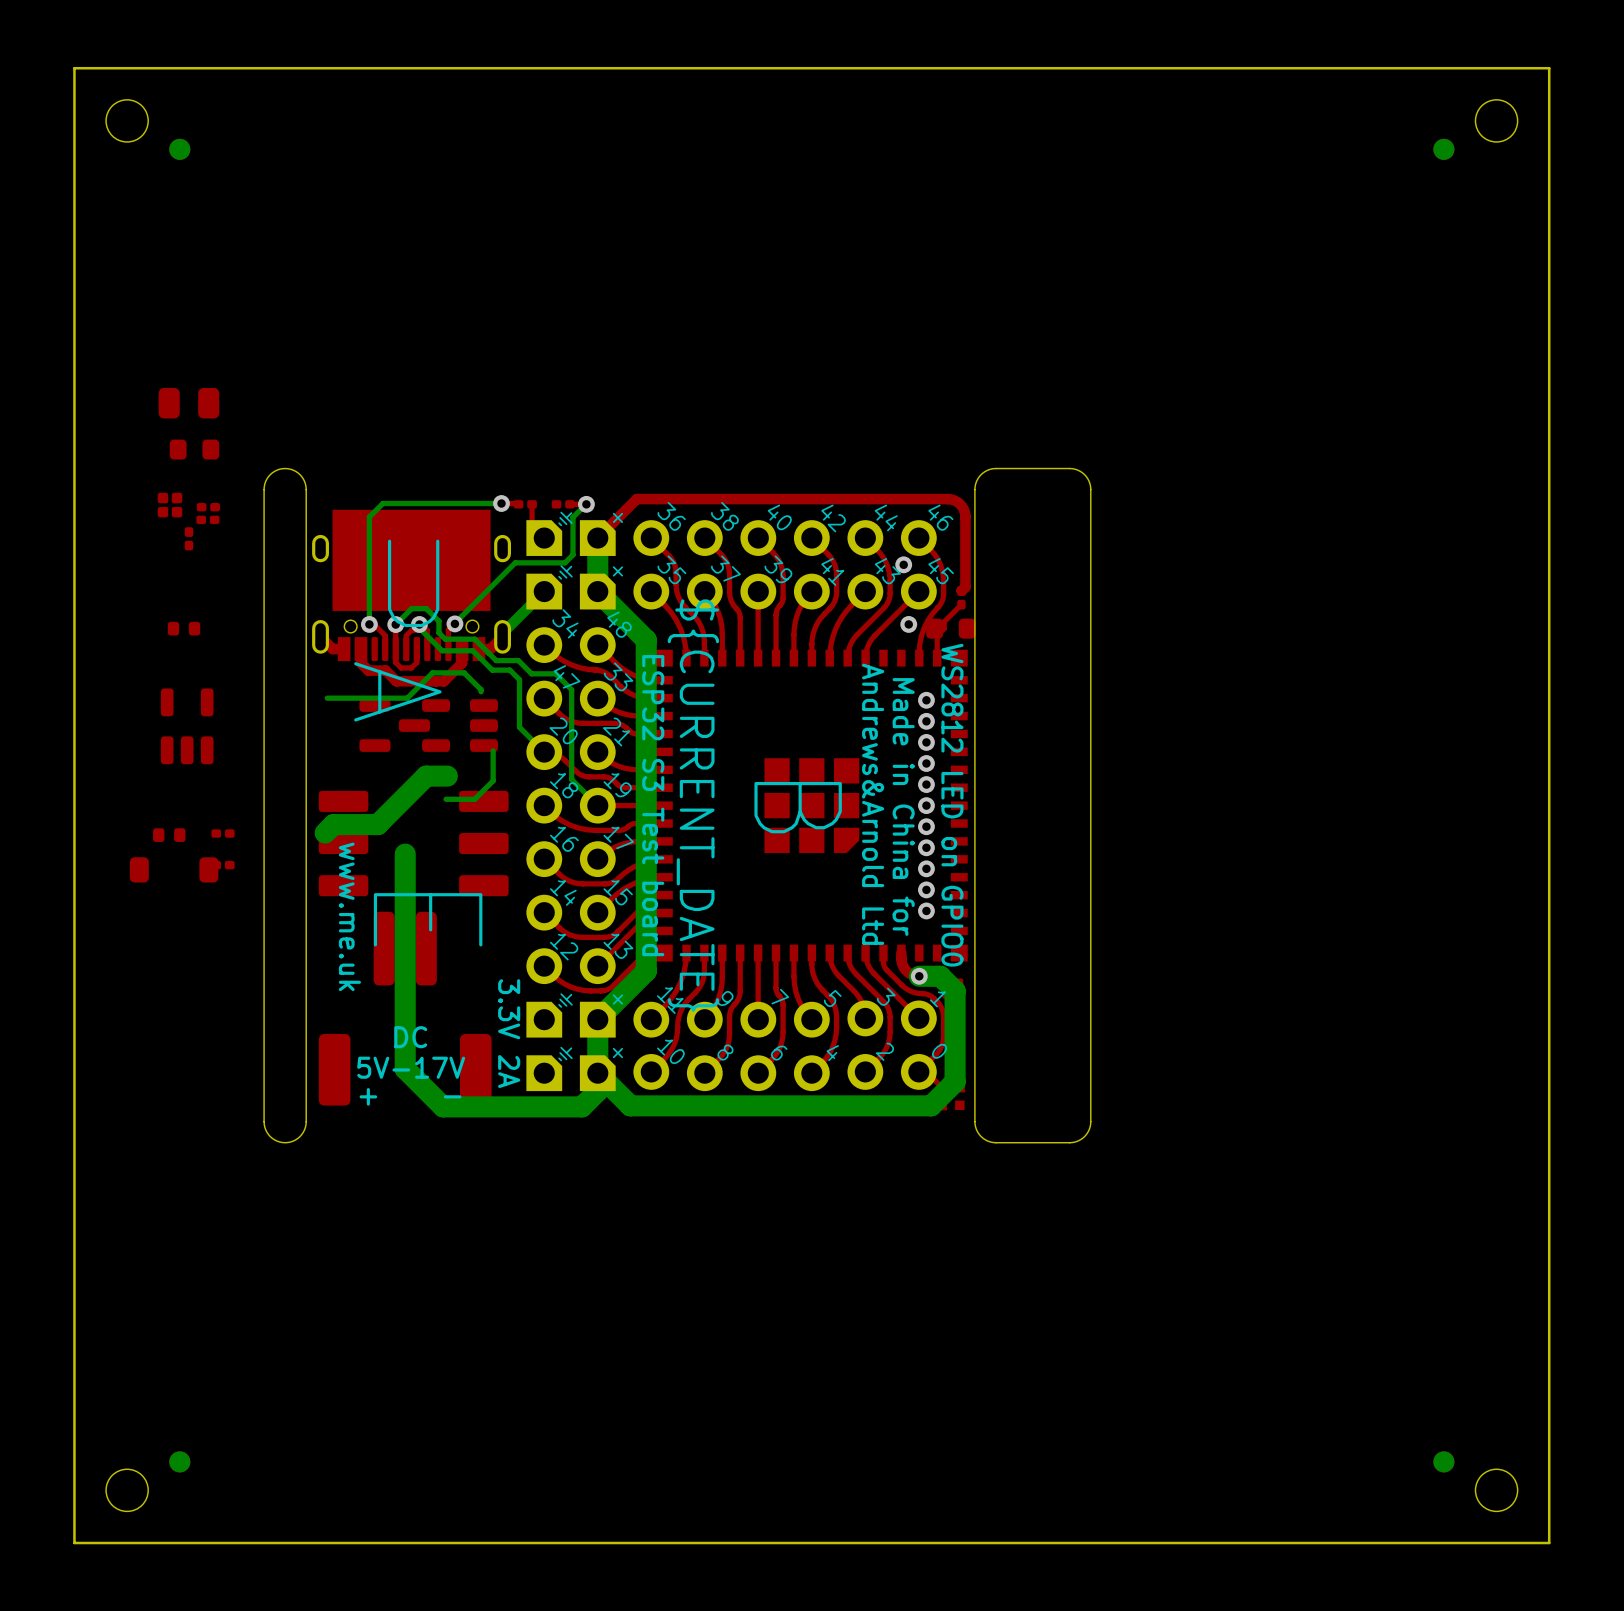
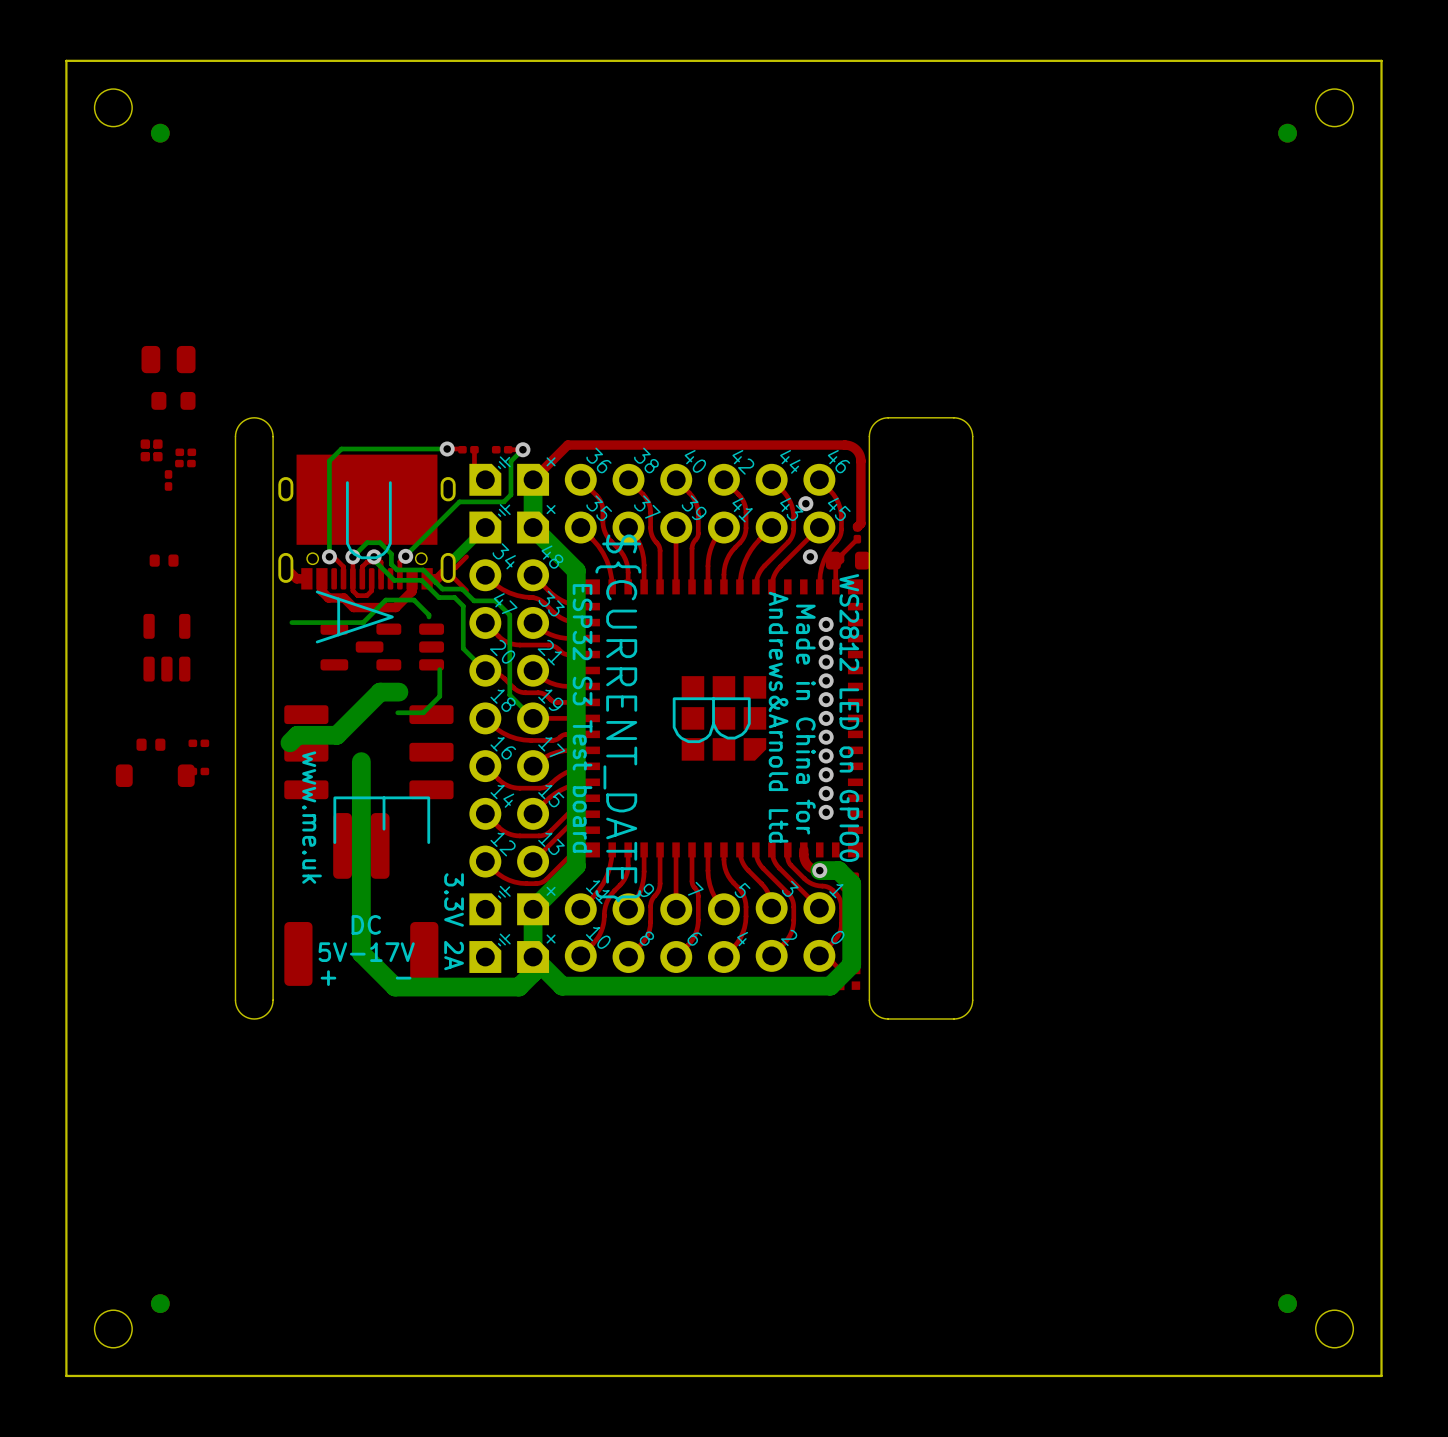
top track: none -> (466, 556) (455, 567) (448, 567)
top track: none -> (448, 572) (466, 590)

